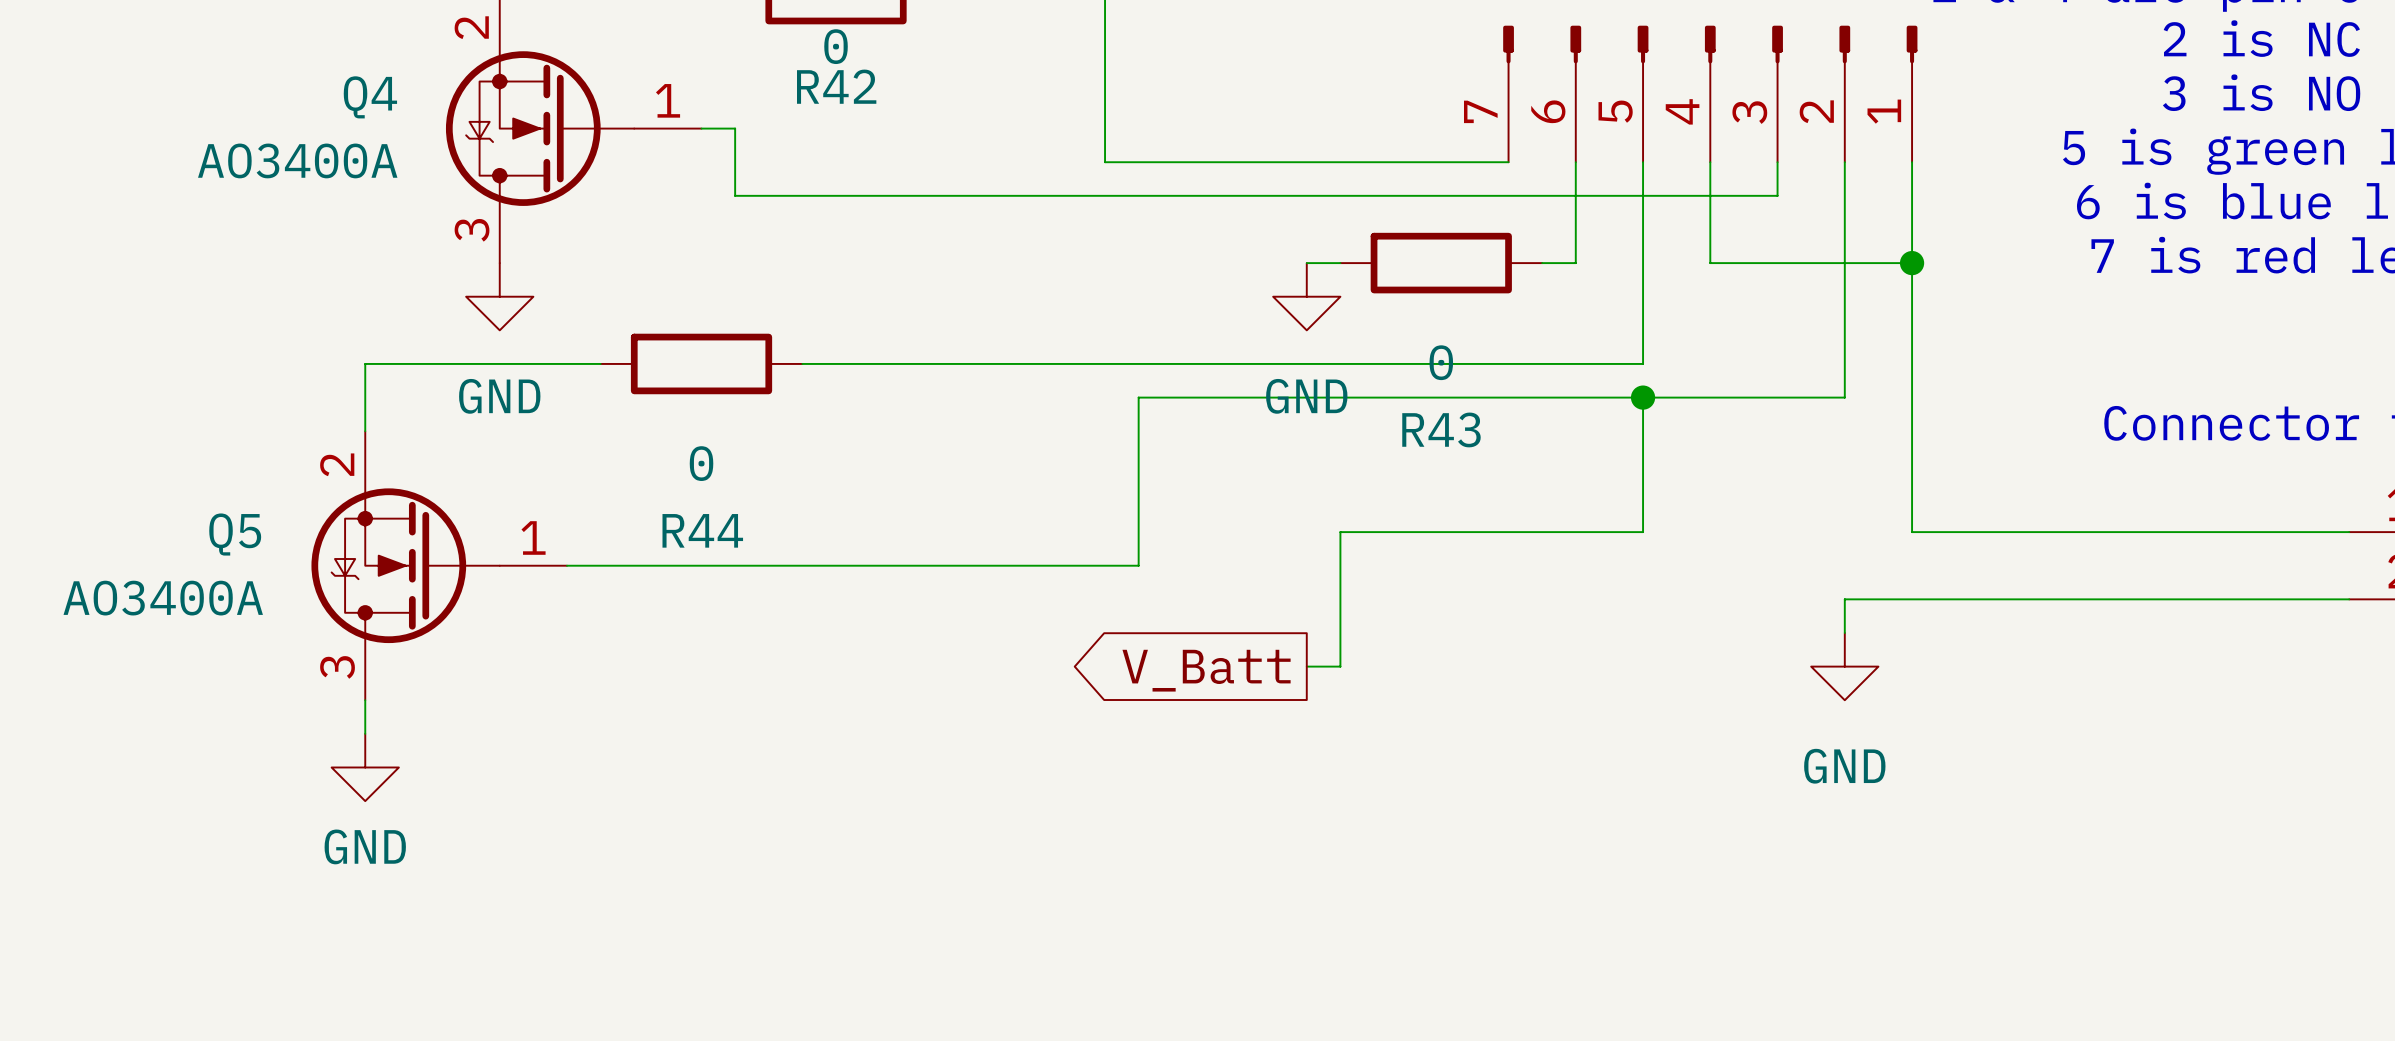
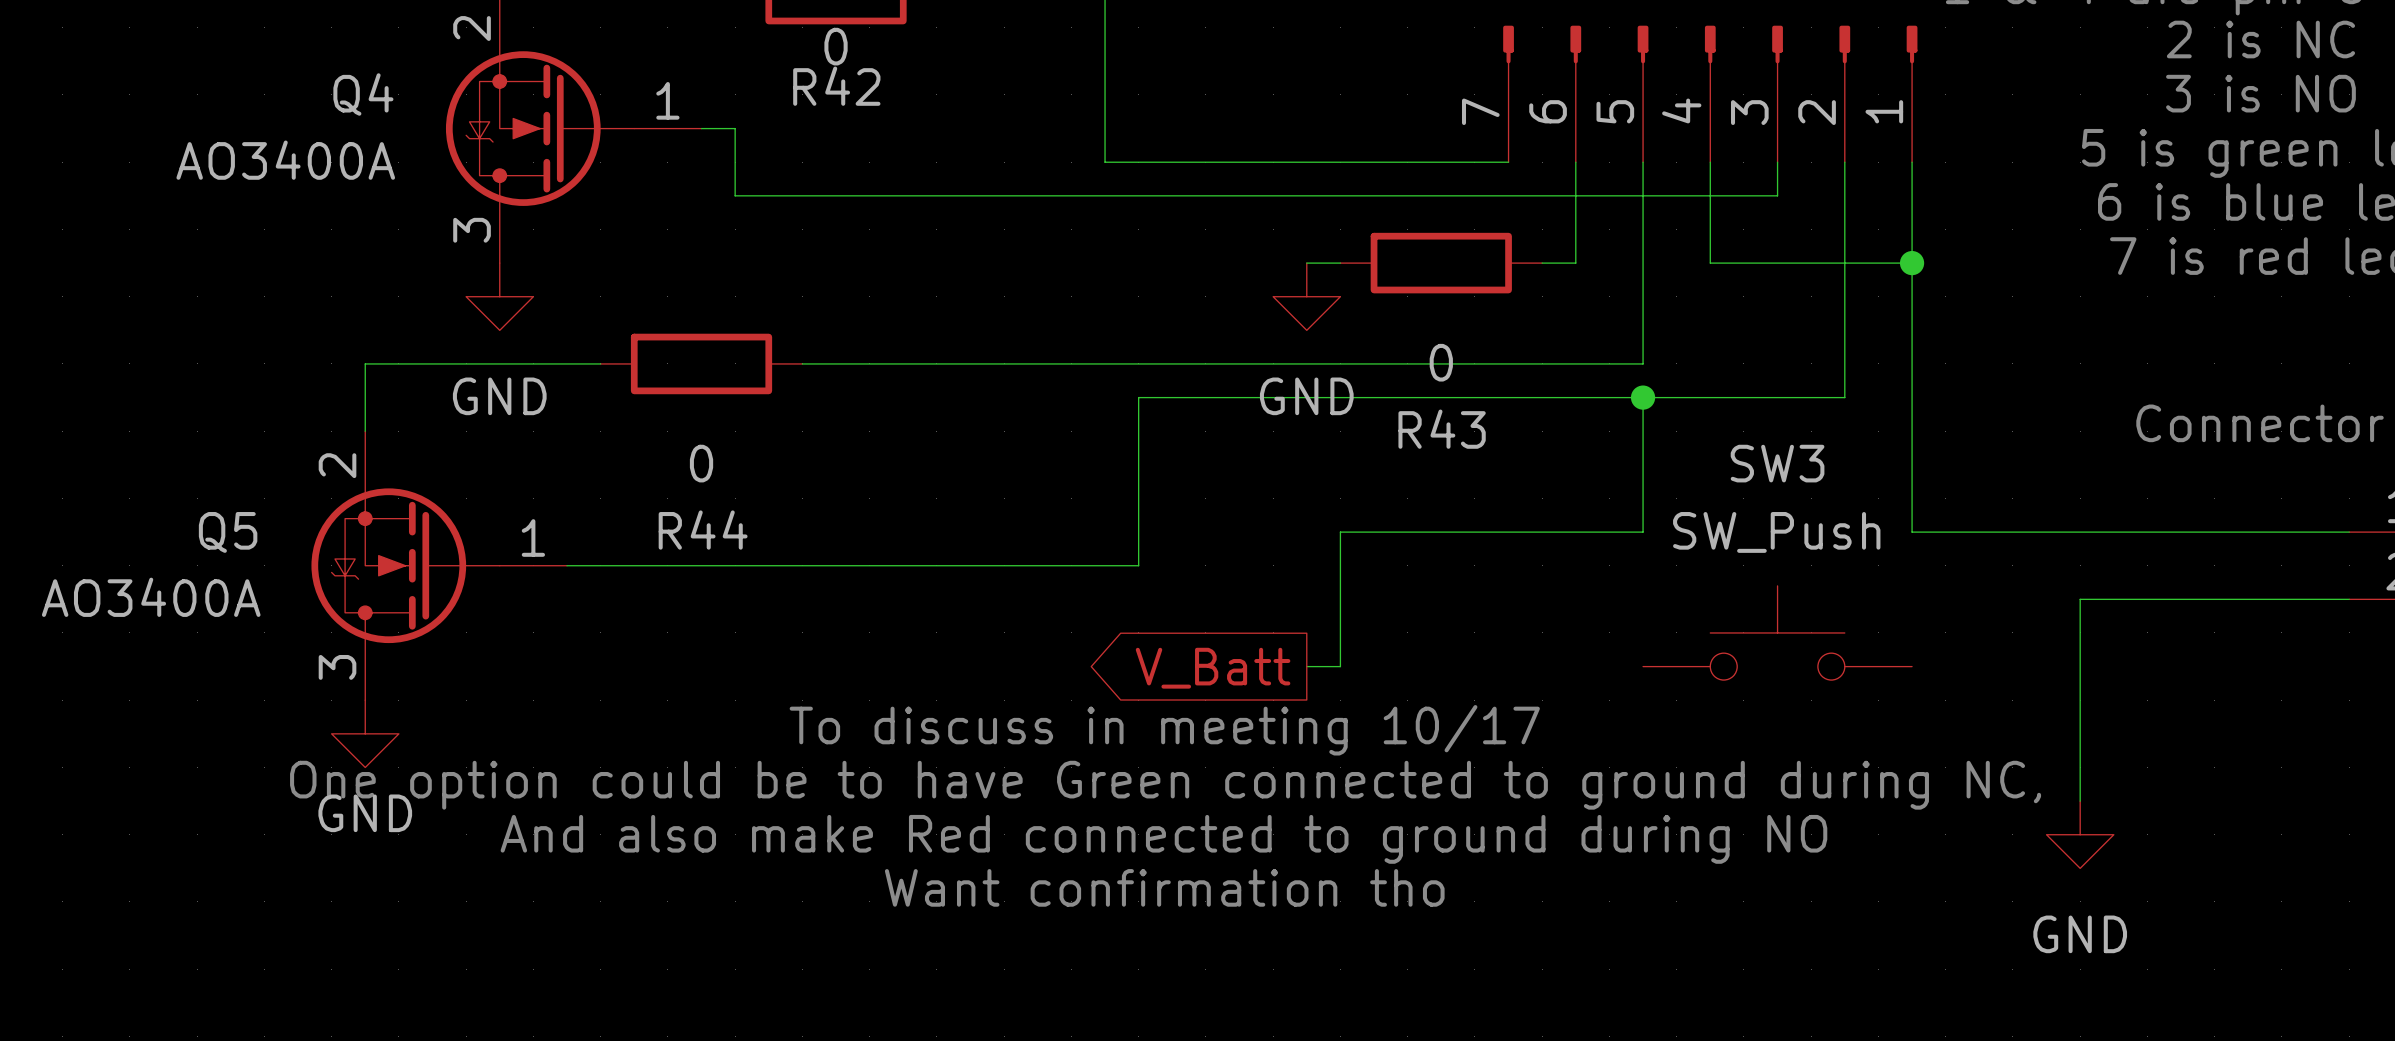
wire: (2080, 599) (1844, 599) (1844, 632) -> (2080, 599) (2080, 801)
SW3: none -> SW_Push (1777, 632)
power symbol position: GND (1844, 666) -> GND (2080, 834)
text: none -> To discuss in meeting 10/17 (1164, 730)
power symbol position: GND (365, 767) -> GND (365, 733)
text: none -> One option could be to have Green connected to ground during NC, (1165, 785)
text: none -> And also make Red connected to ground during NO (1163, 839)
text: none -> Want confirmation tho (1164, 887)

